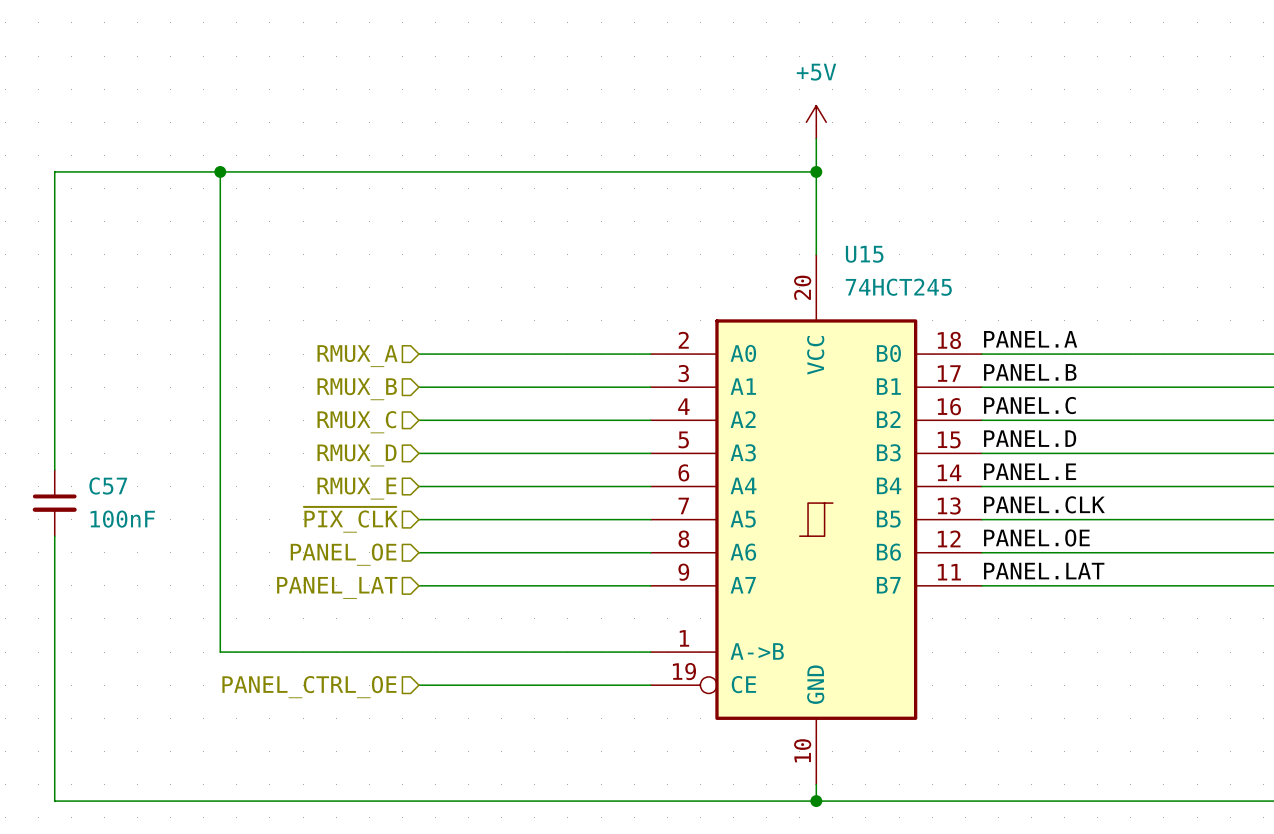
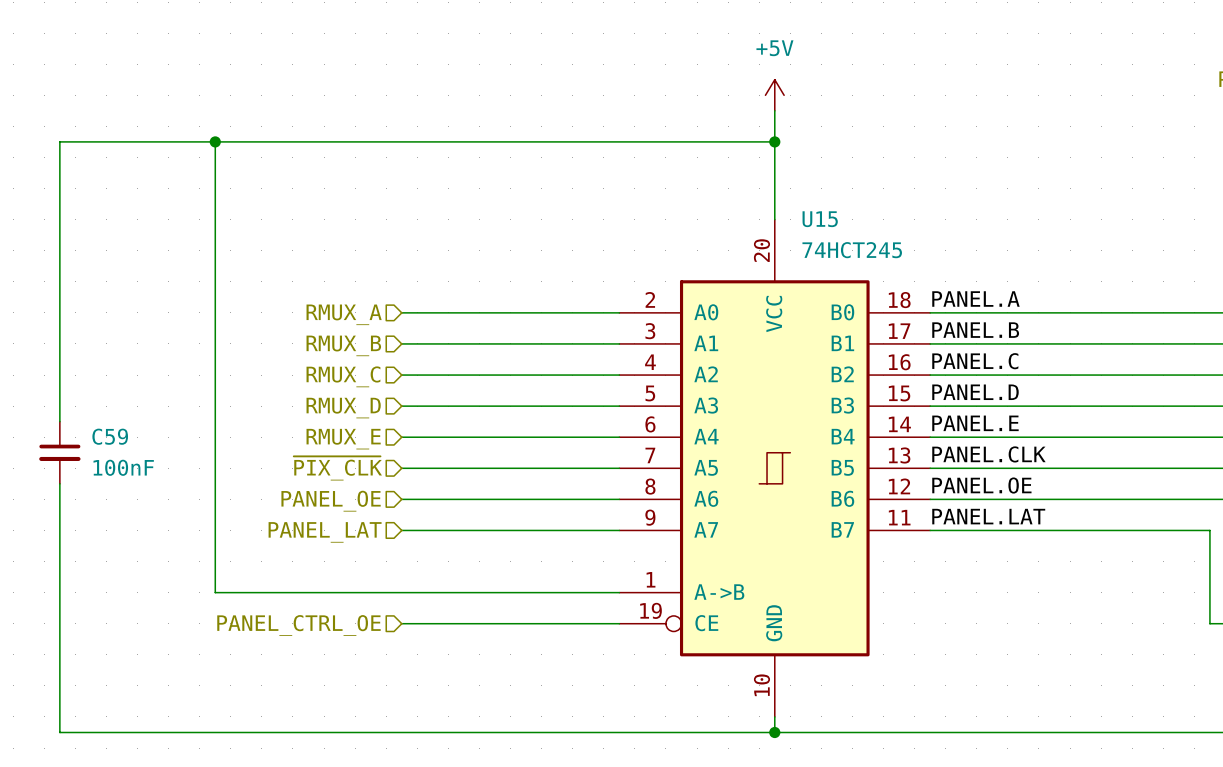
C57 name: C57 (108, 485) -> C59 (110, 436)

